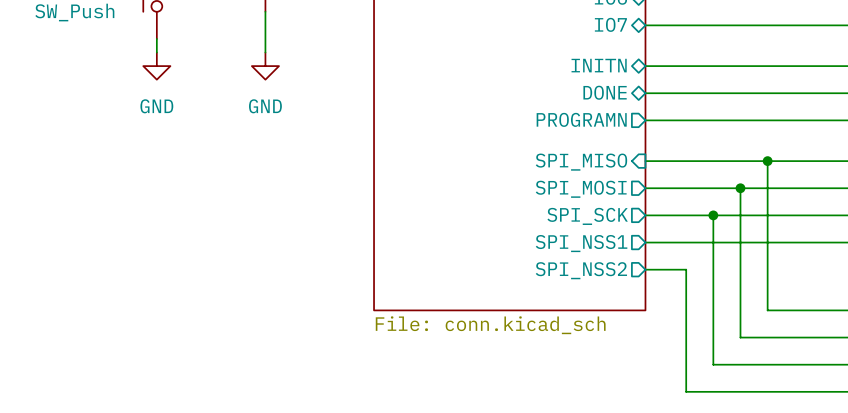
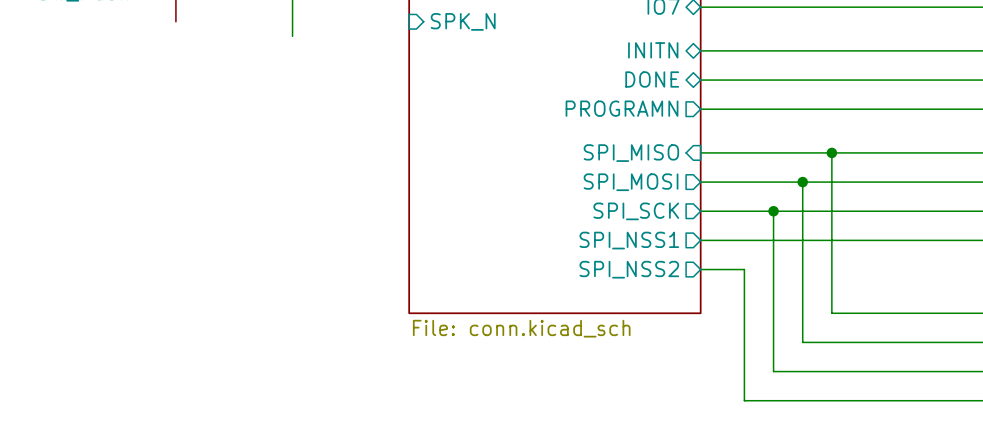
wire: (156, 38) (156, 52) -> none
sheet pin: none -> SPK_N (463, 21)
power symbol: GND (156, 66) -> none
power symbol: GND (265, 66) -> none

